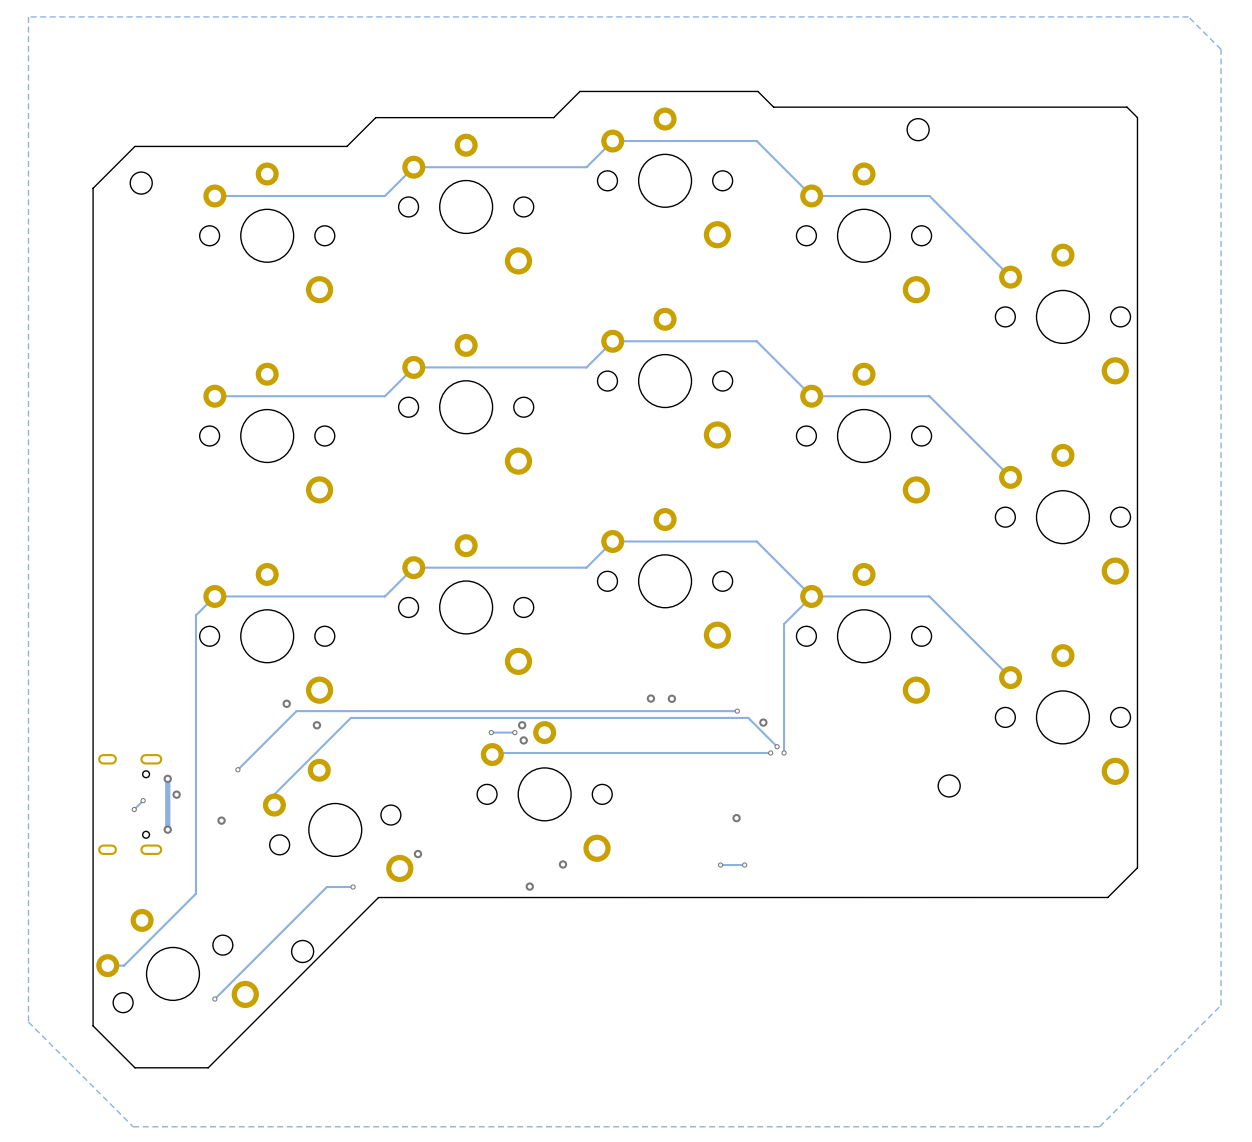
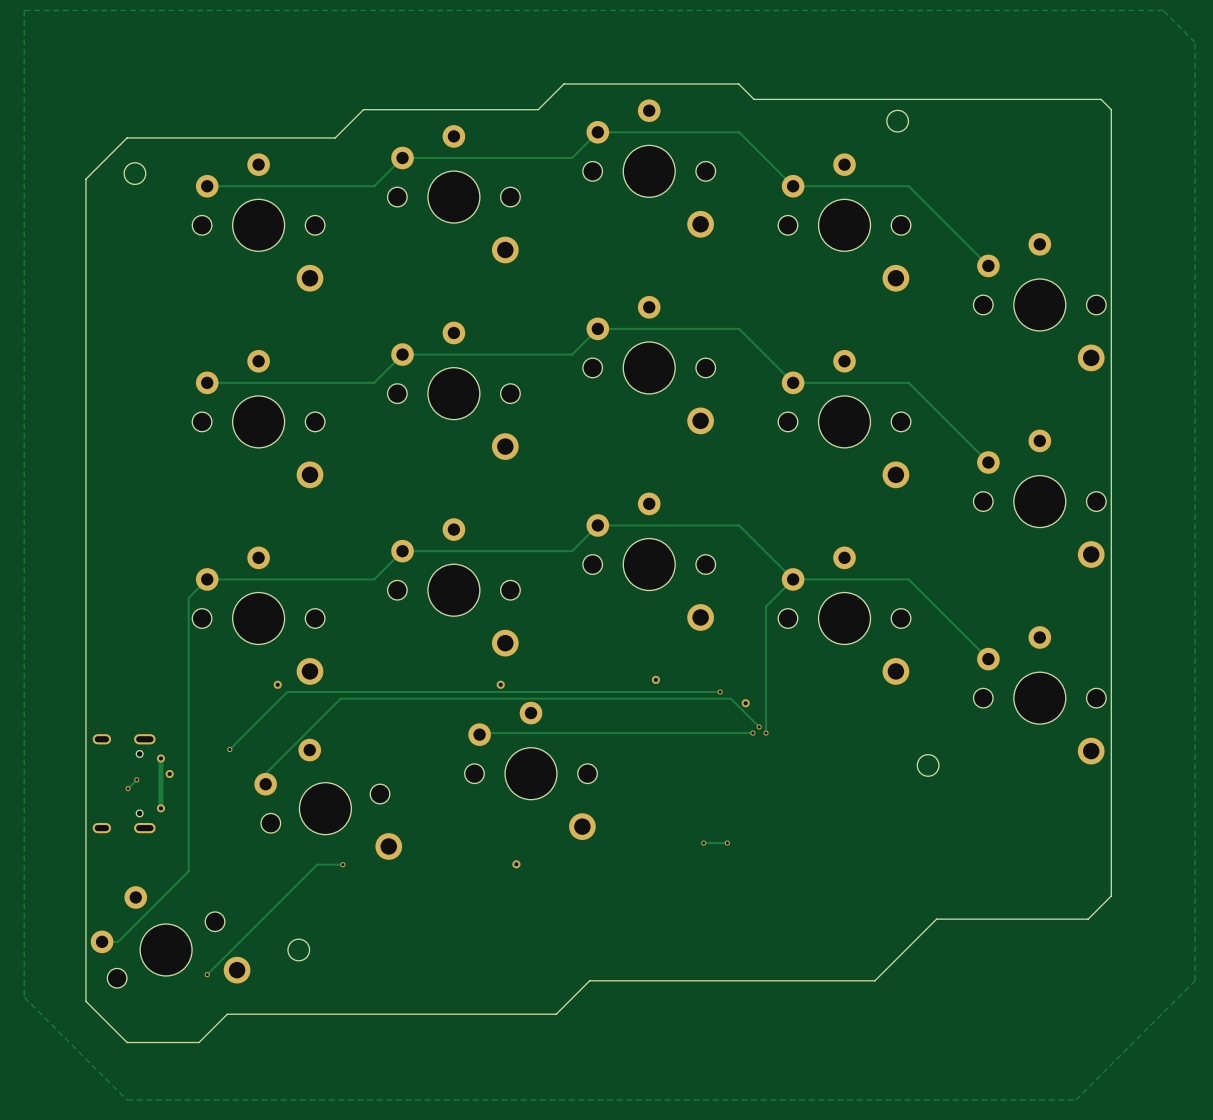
board edge: (757, 91) (579, 91) (553, 117) (375, 117) (346, 146) (134, 146) (93, 188) (93, 1025) (134, 1067) (208, 1067) (378, 897) (1107, 897) (1137, 867) (1137, 117) (1127, 107) (773, 107) (757, 91) -> (738, 83) (754, 99) (1101, 99) (1111, 109) (1111, 896) (1088, 919) (936, 919) (874, 980) (589, 980) (556, 1014) (227, 1014) (199, 1042) (127, 1042) (85, 1001) (85, 179) (127, 137) (335, 137) (363, 109) (538, 109) (563, 83) (738, 83)
via: (650, 698) -> none
via: none -> (500, 684)
via: (316, 725) -> none
via: (522, 725) -> none
via: (491, 732) -> none
track: (514, 732) (491, 732) -> none
via: (514, 732) -> none
via: (523, 740) -> none
via: (736, 818) -> none
via: (221, 820) -> none
via: (417, 854) -> none
via: (562, 864) -> none
round board edge position: (302, 951) -> (298, 949)

